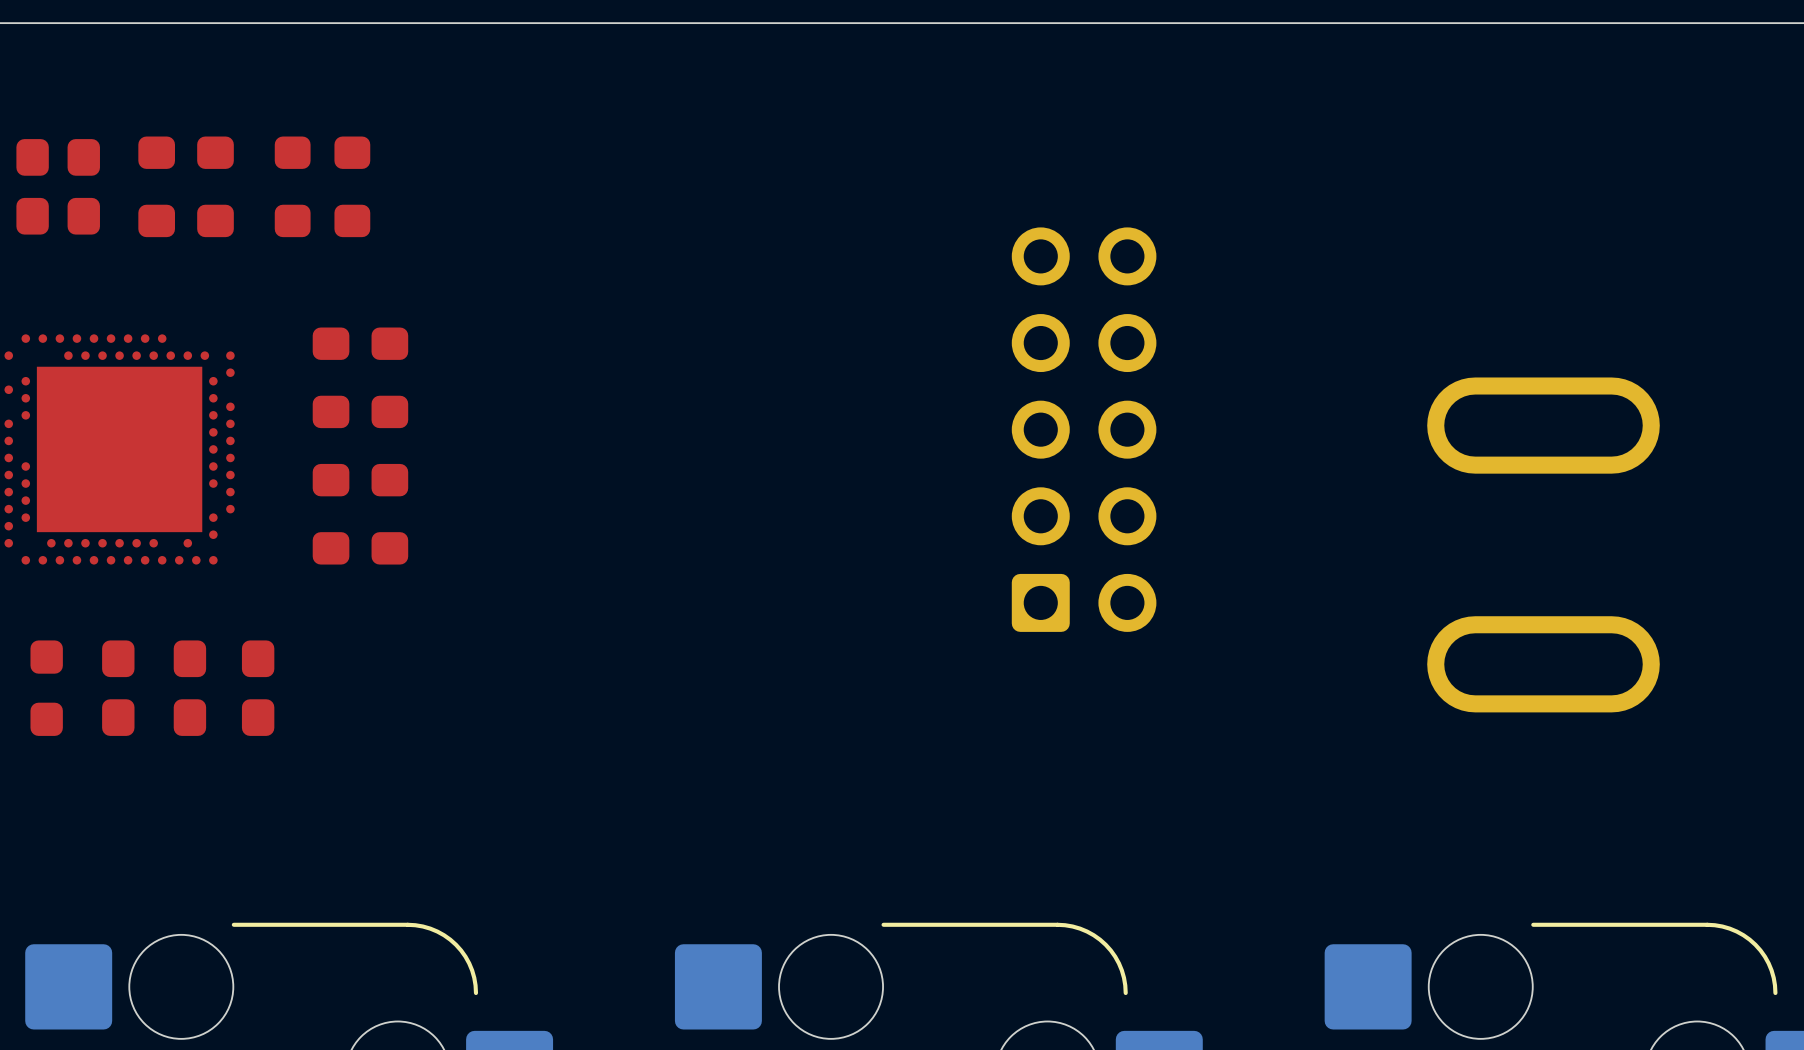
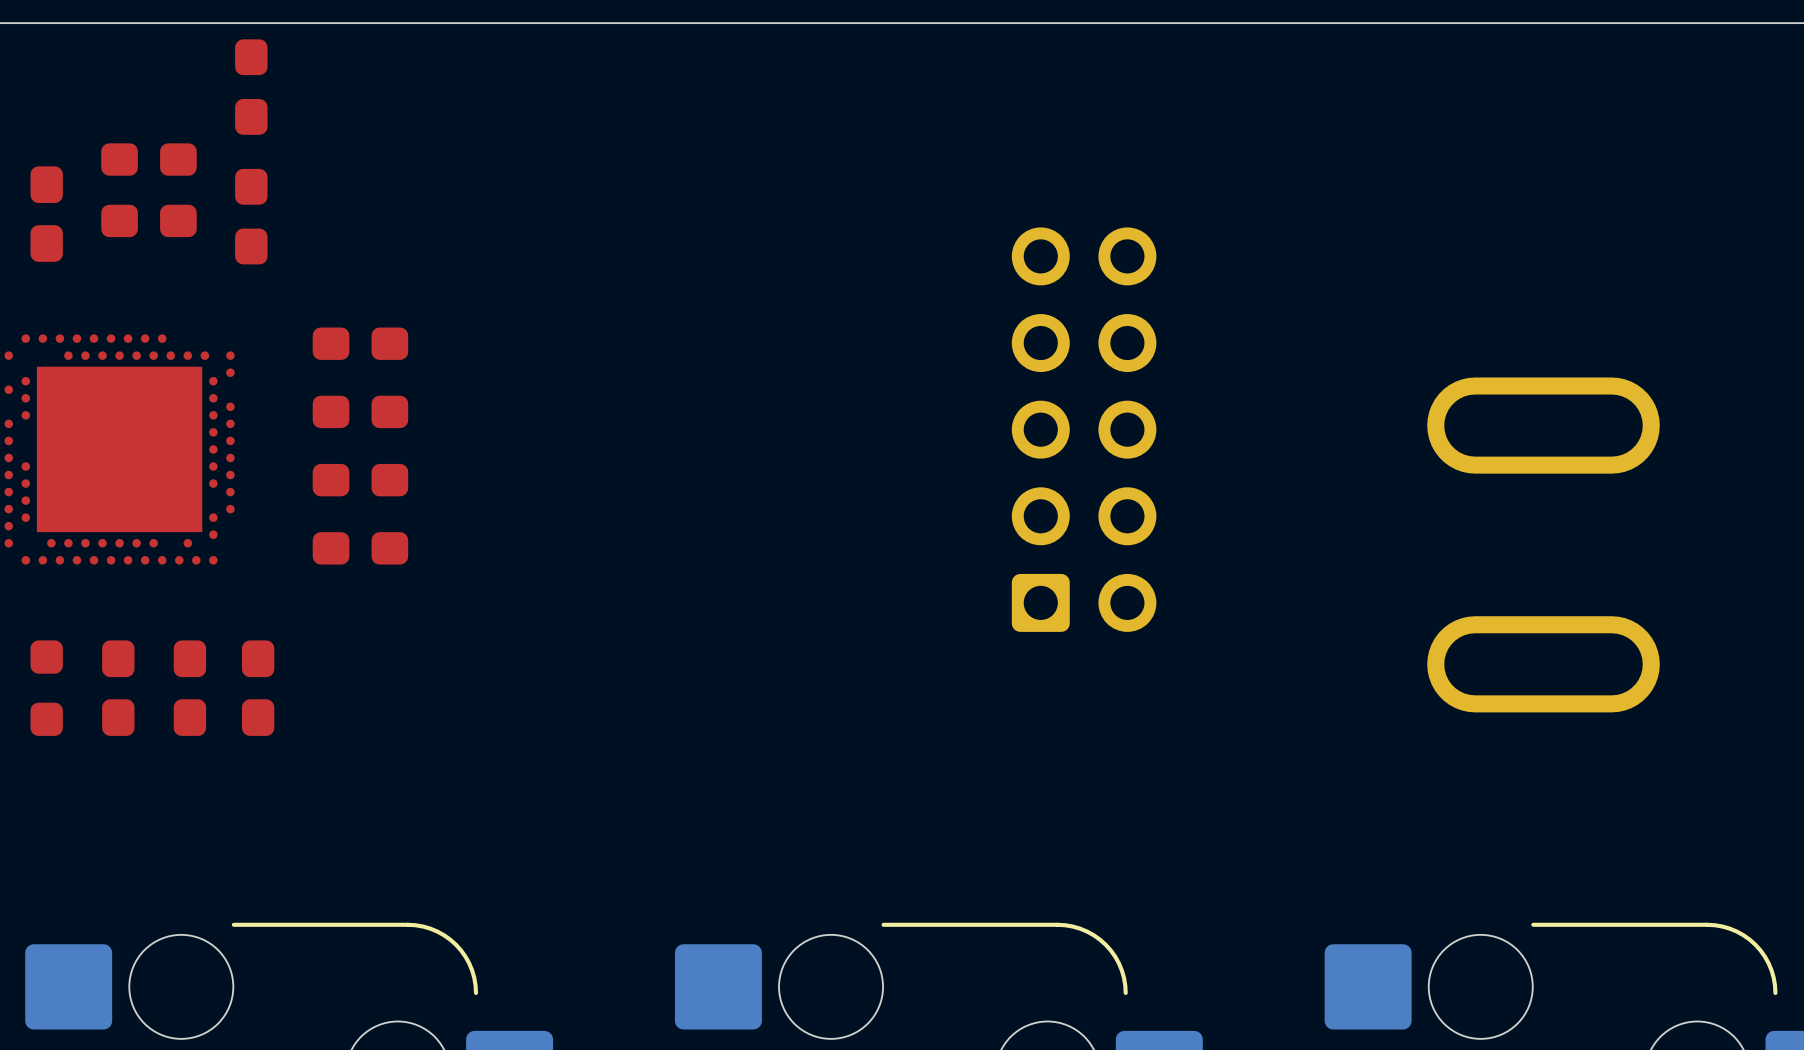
part: none -> (251, 87)
part: (186, 152) -> none
part: (322, 152) -> none
part: none -> (148, 159)
part: (32, 186) -> none
part: (83, 186) -> none
part: none -> (46, 214)
part: none -> (251, 216)
part: none -> (148, 220)
part: (186, 220) -> none
part: (322, 220) -> none

